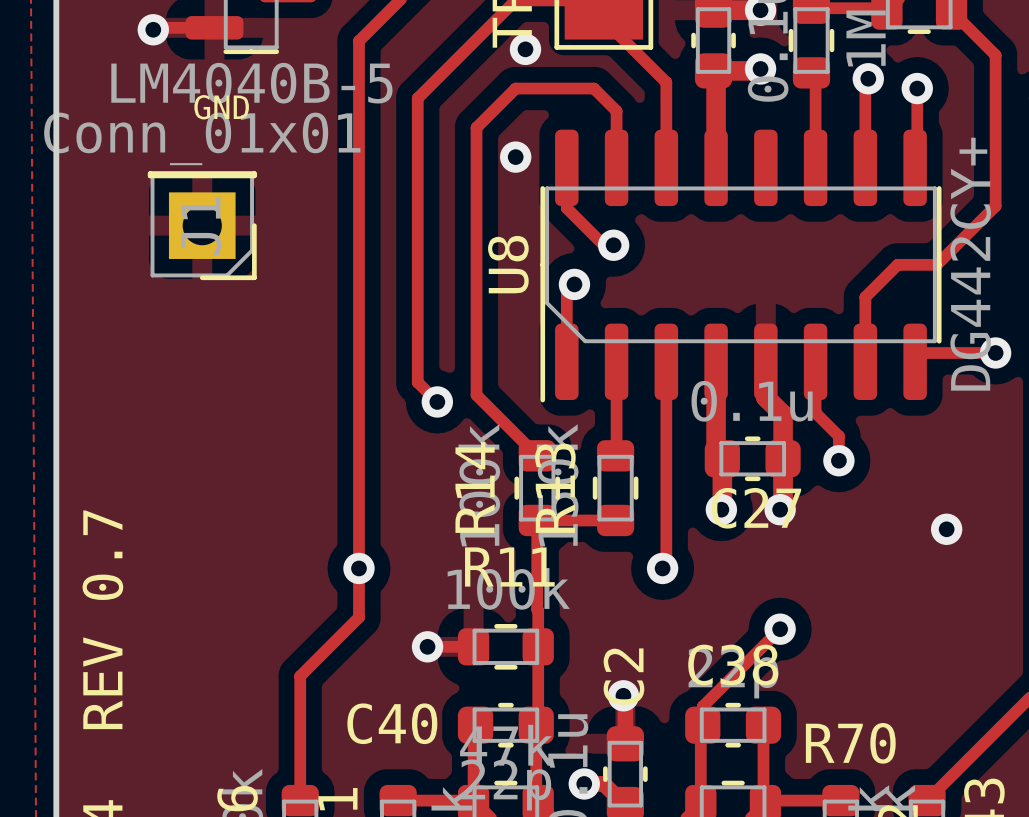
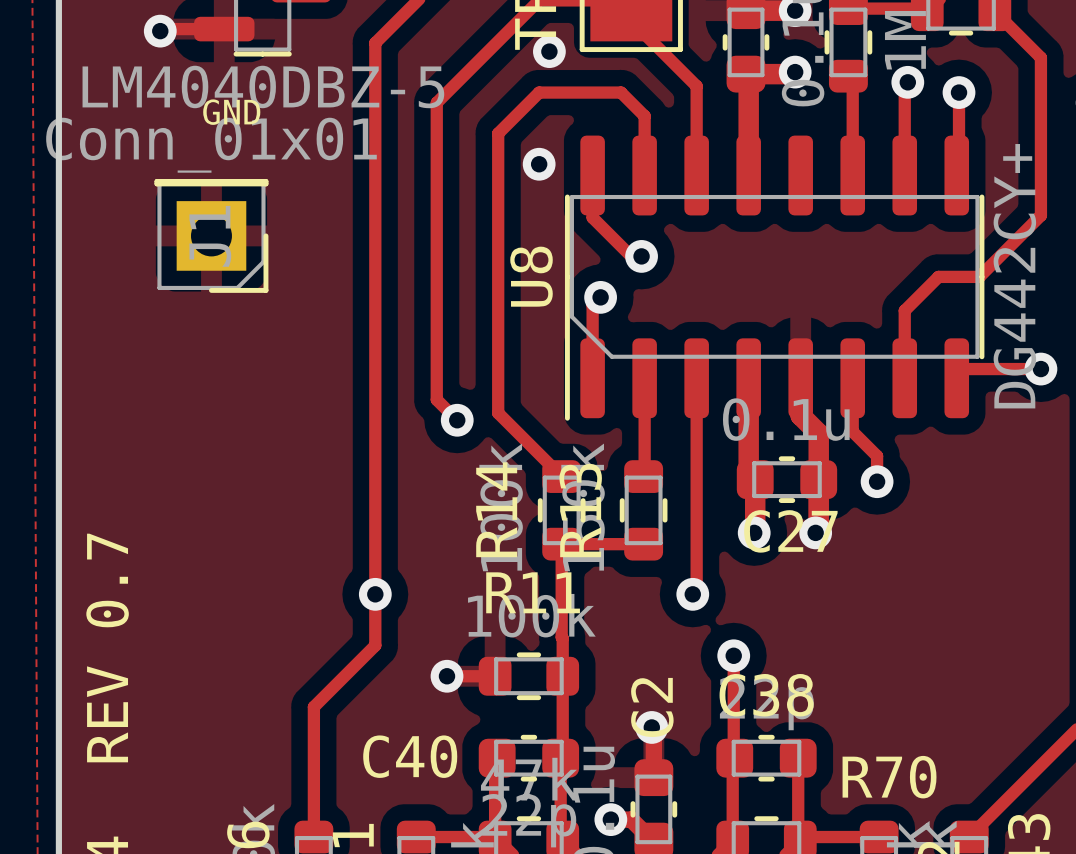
part value: LM4040B-5 (251, 83) -> LM4040DBZ-5 (263, 86)
via: (946, 529) -> none
track: (780, 629) (702, 706) (702, 725) -> (733, 655) (734, 758)
via position: (780, 629) -> (733, 655)

